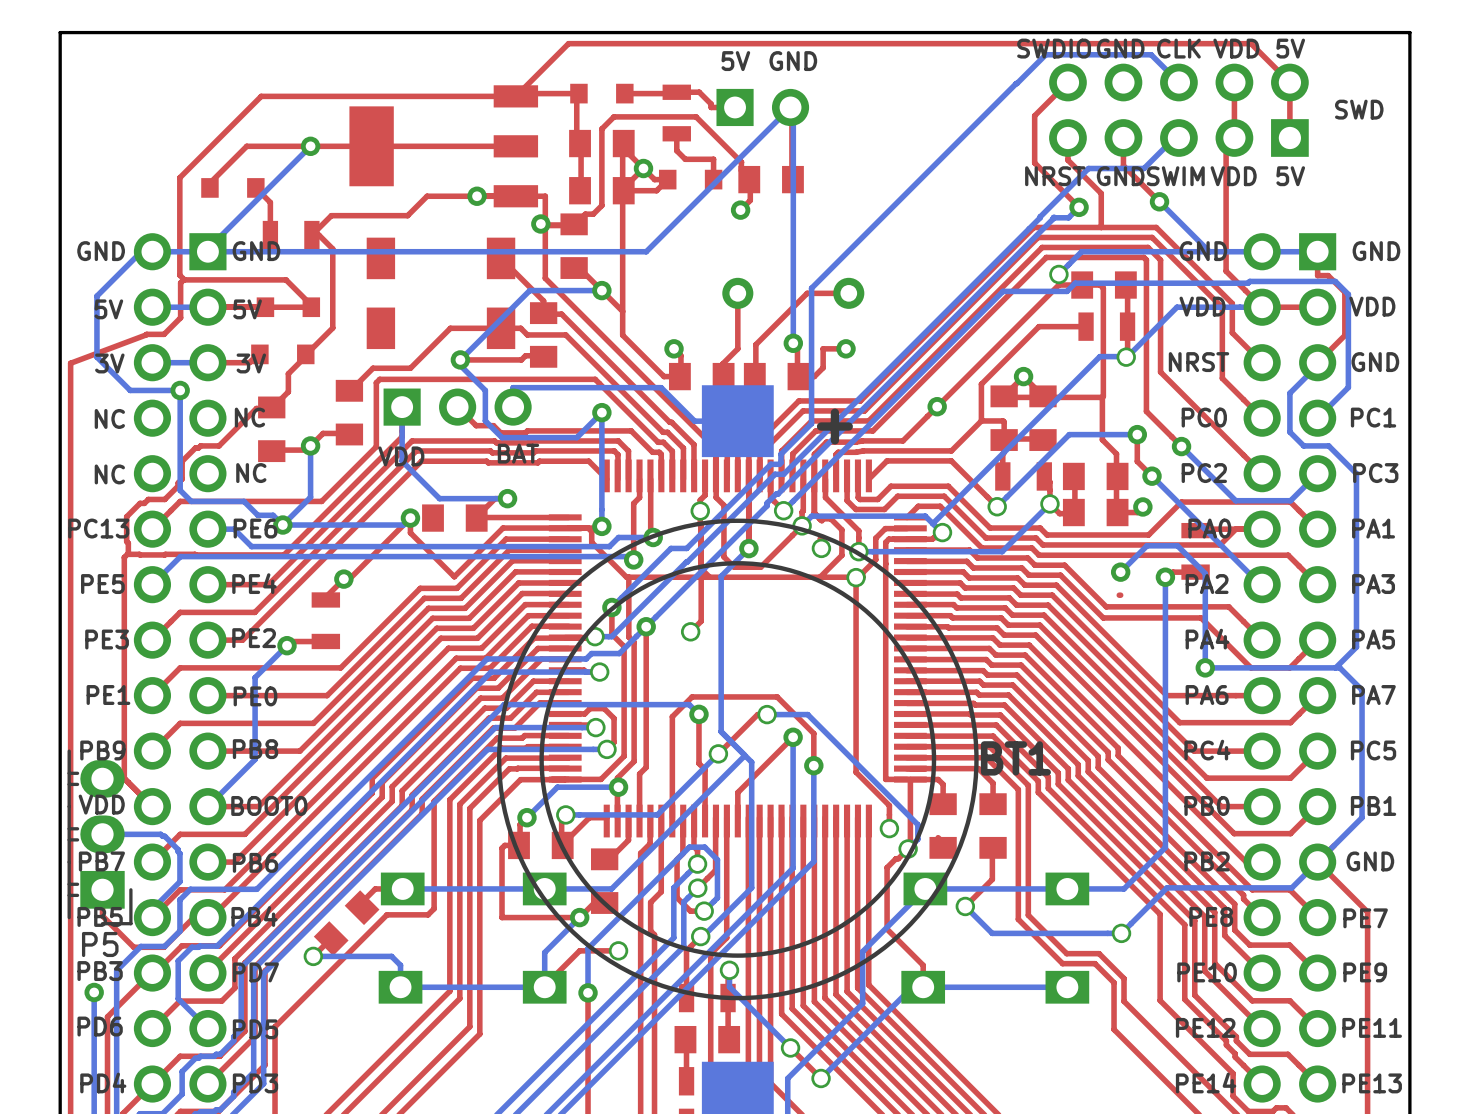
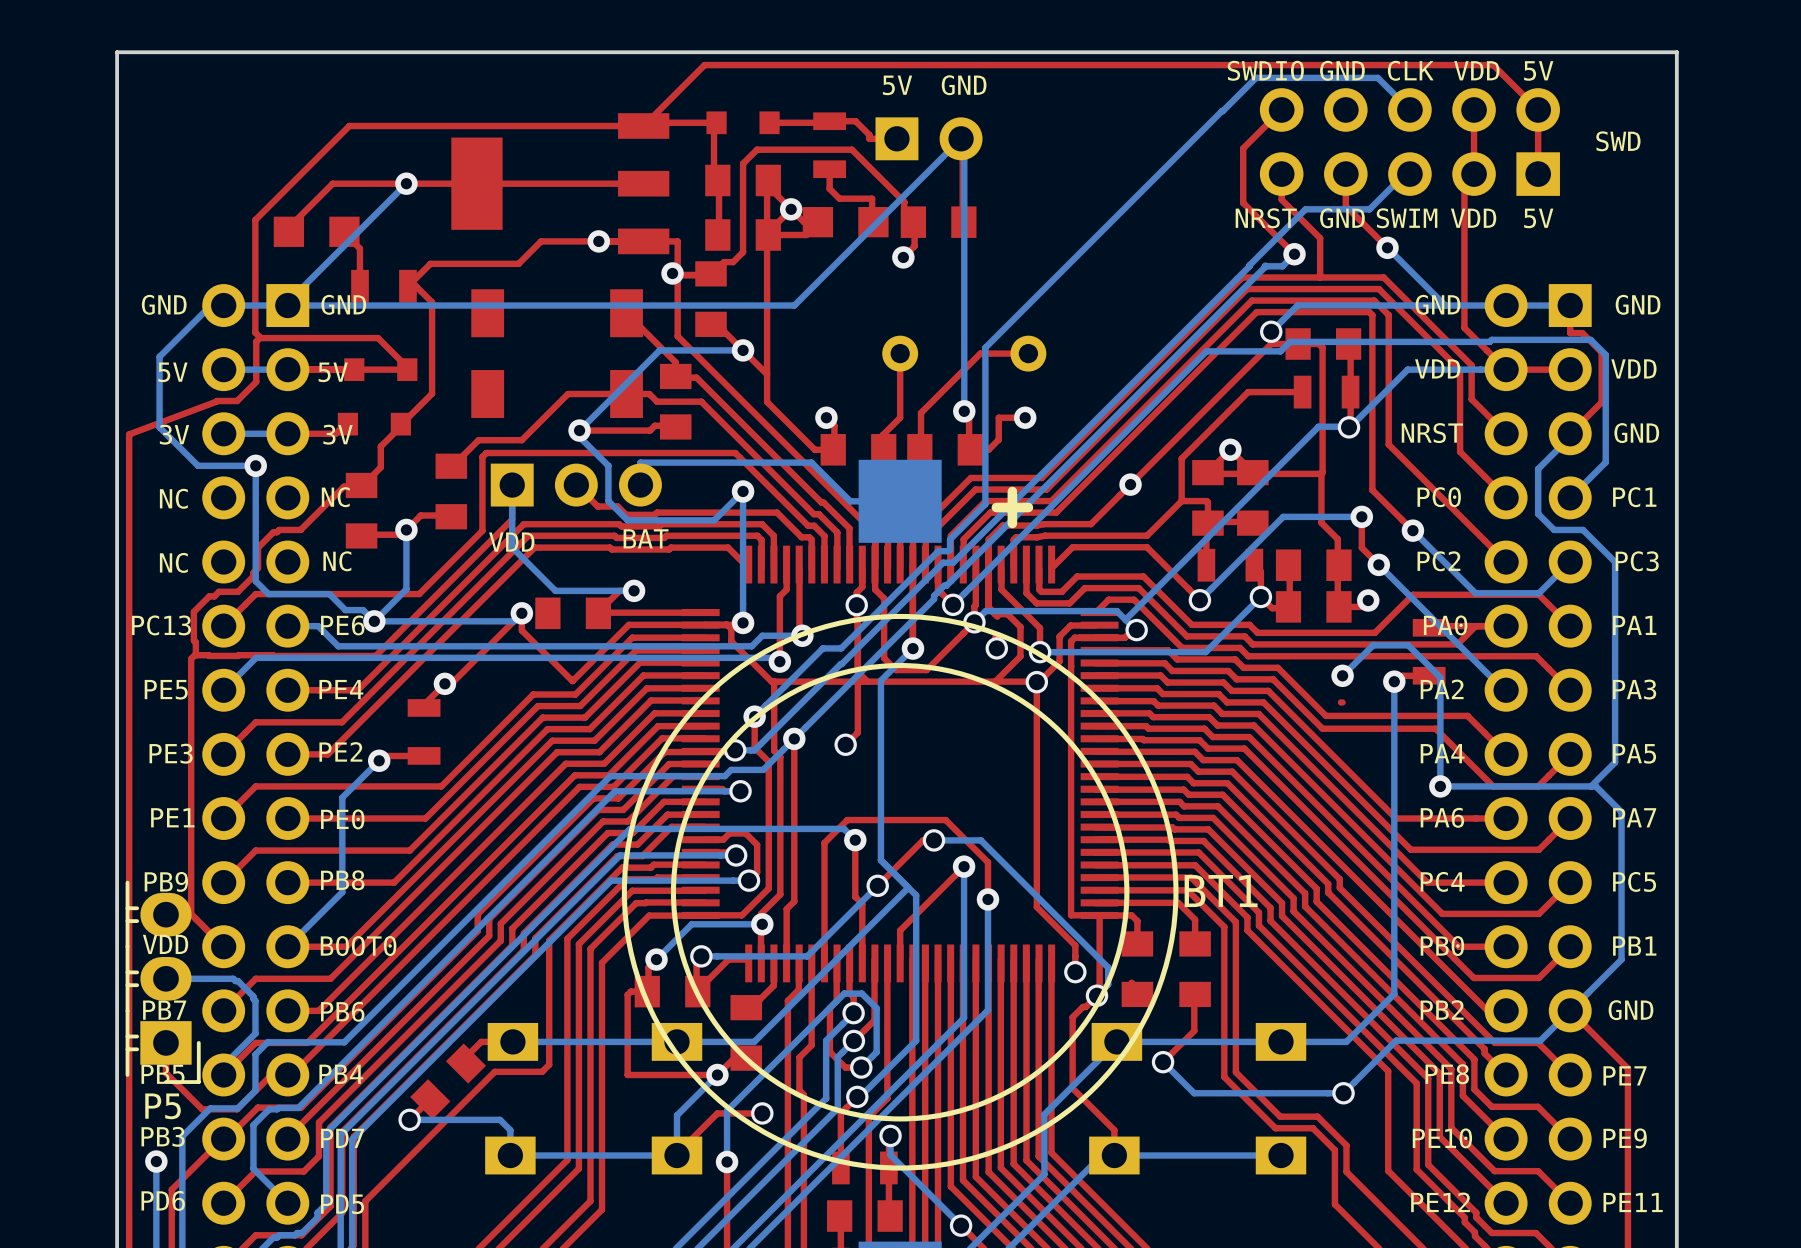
part footprint: [658, 169, 723, 190] -> [802, 207, 889, 238]
part footprint: [201, 178, 265, 198] -> [273, 216, 360, 247]

